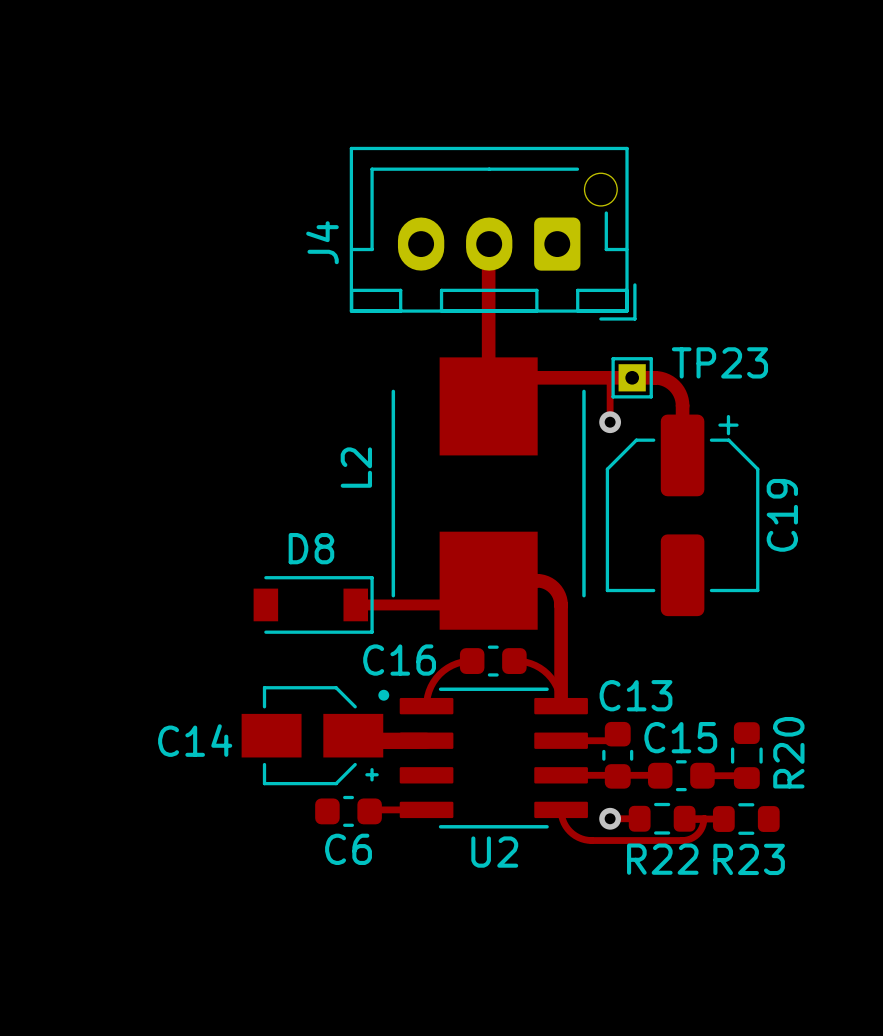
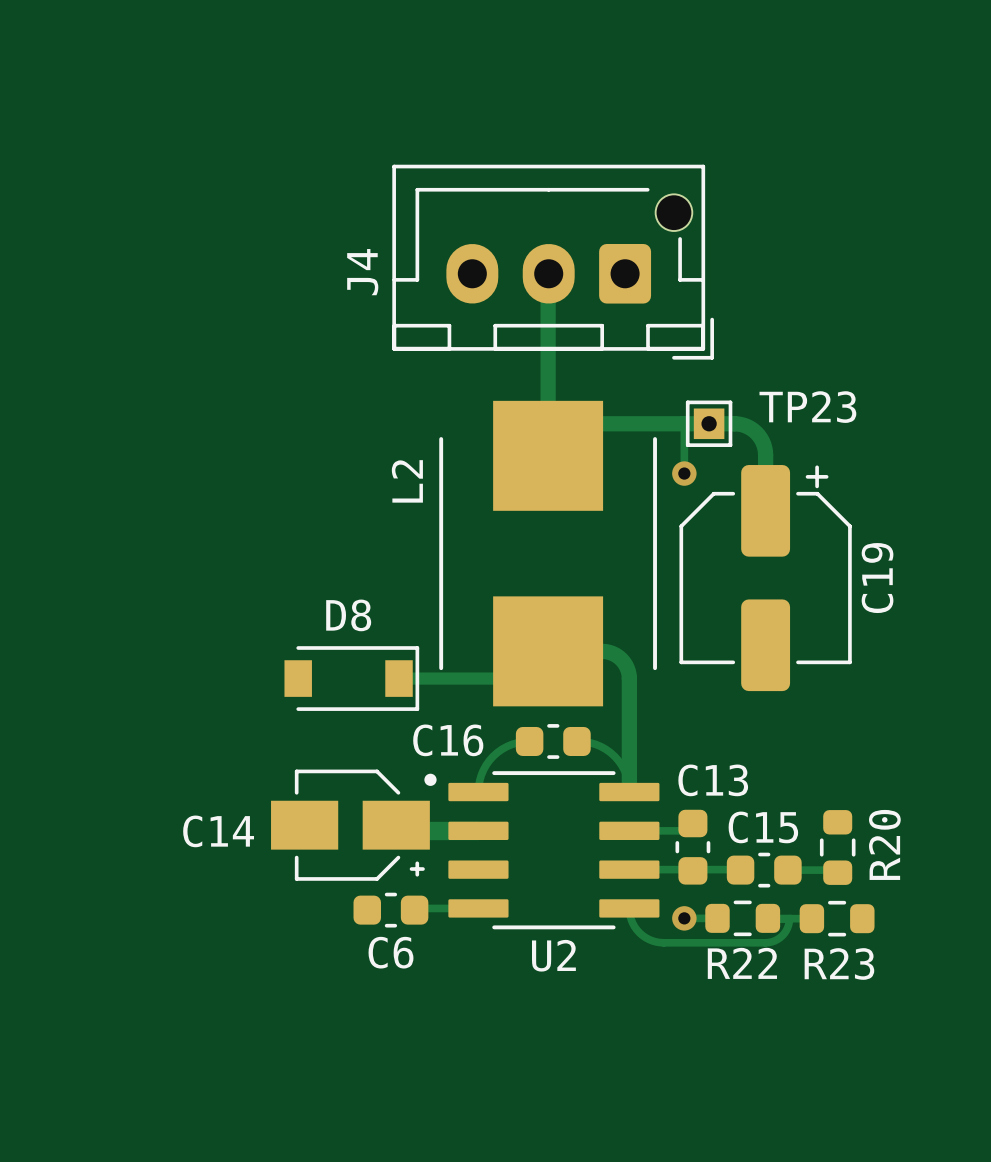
L2 name position: L2 (356, 467) -> L2 (407, 481)

